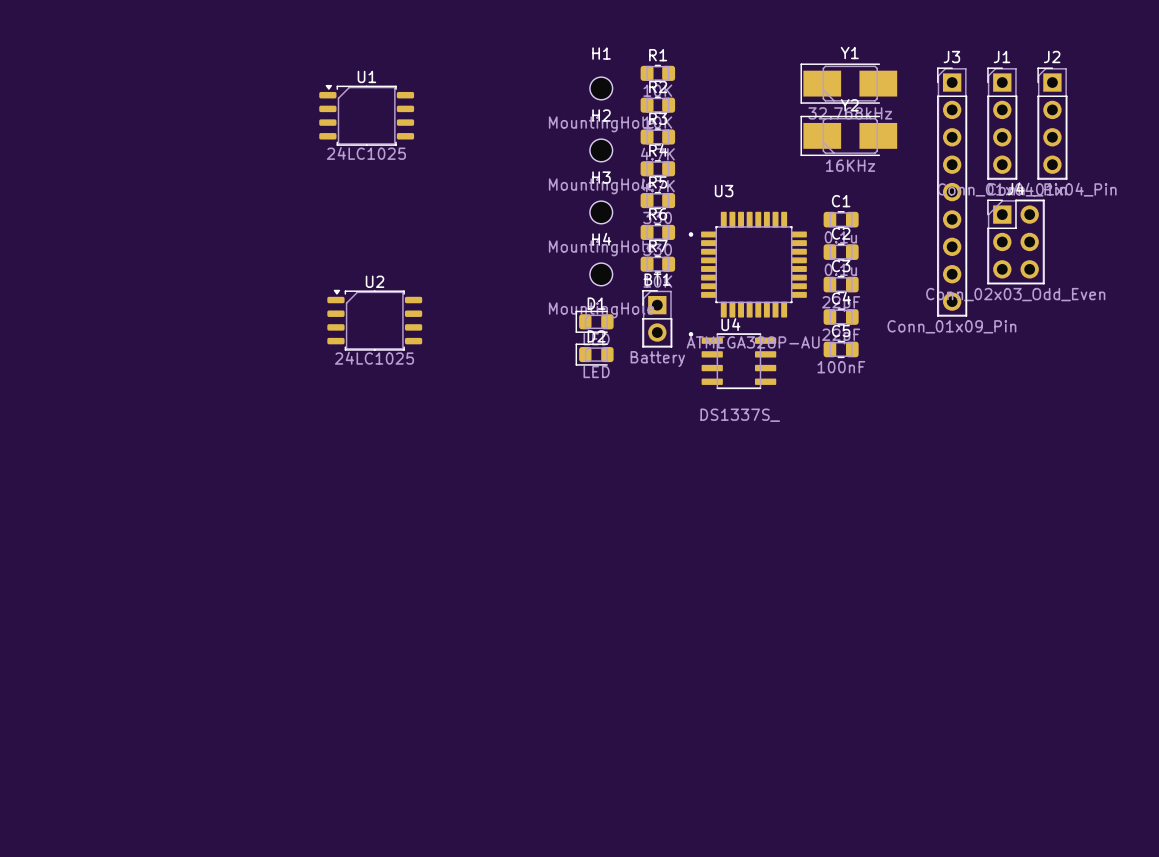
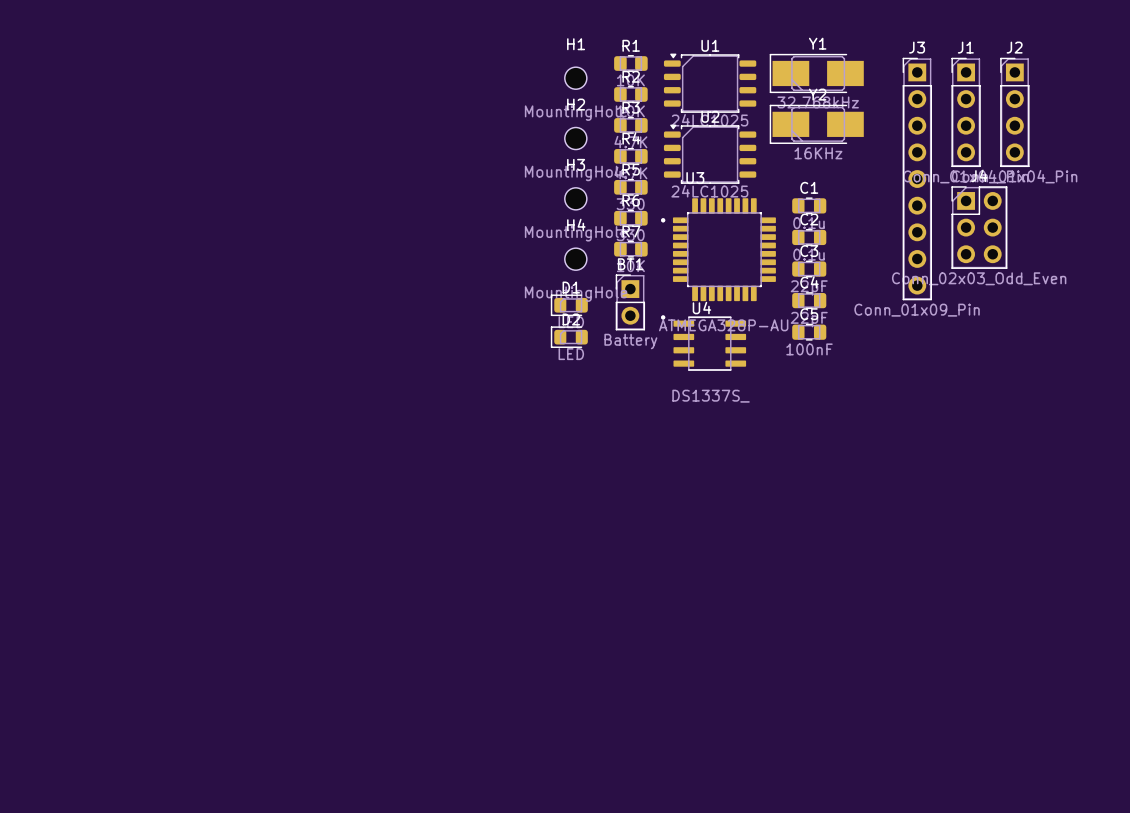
U1 position: (366, 115) -> (710, 83)
U2 position: (374, 320) -> (710, 154)

